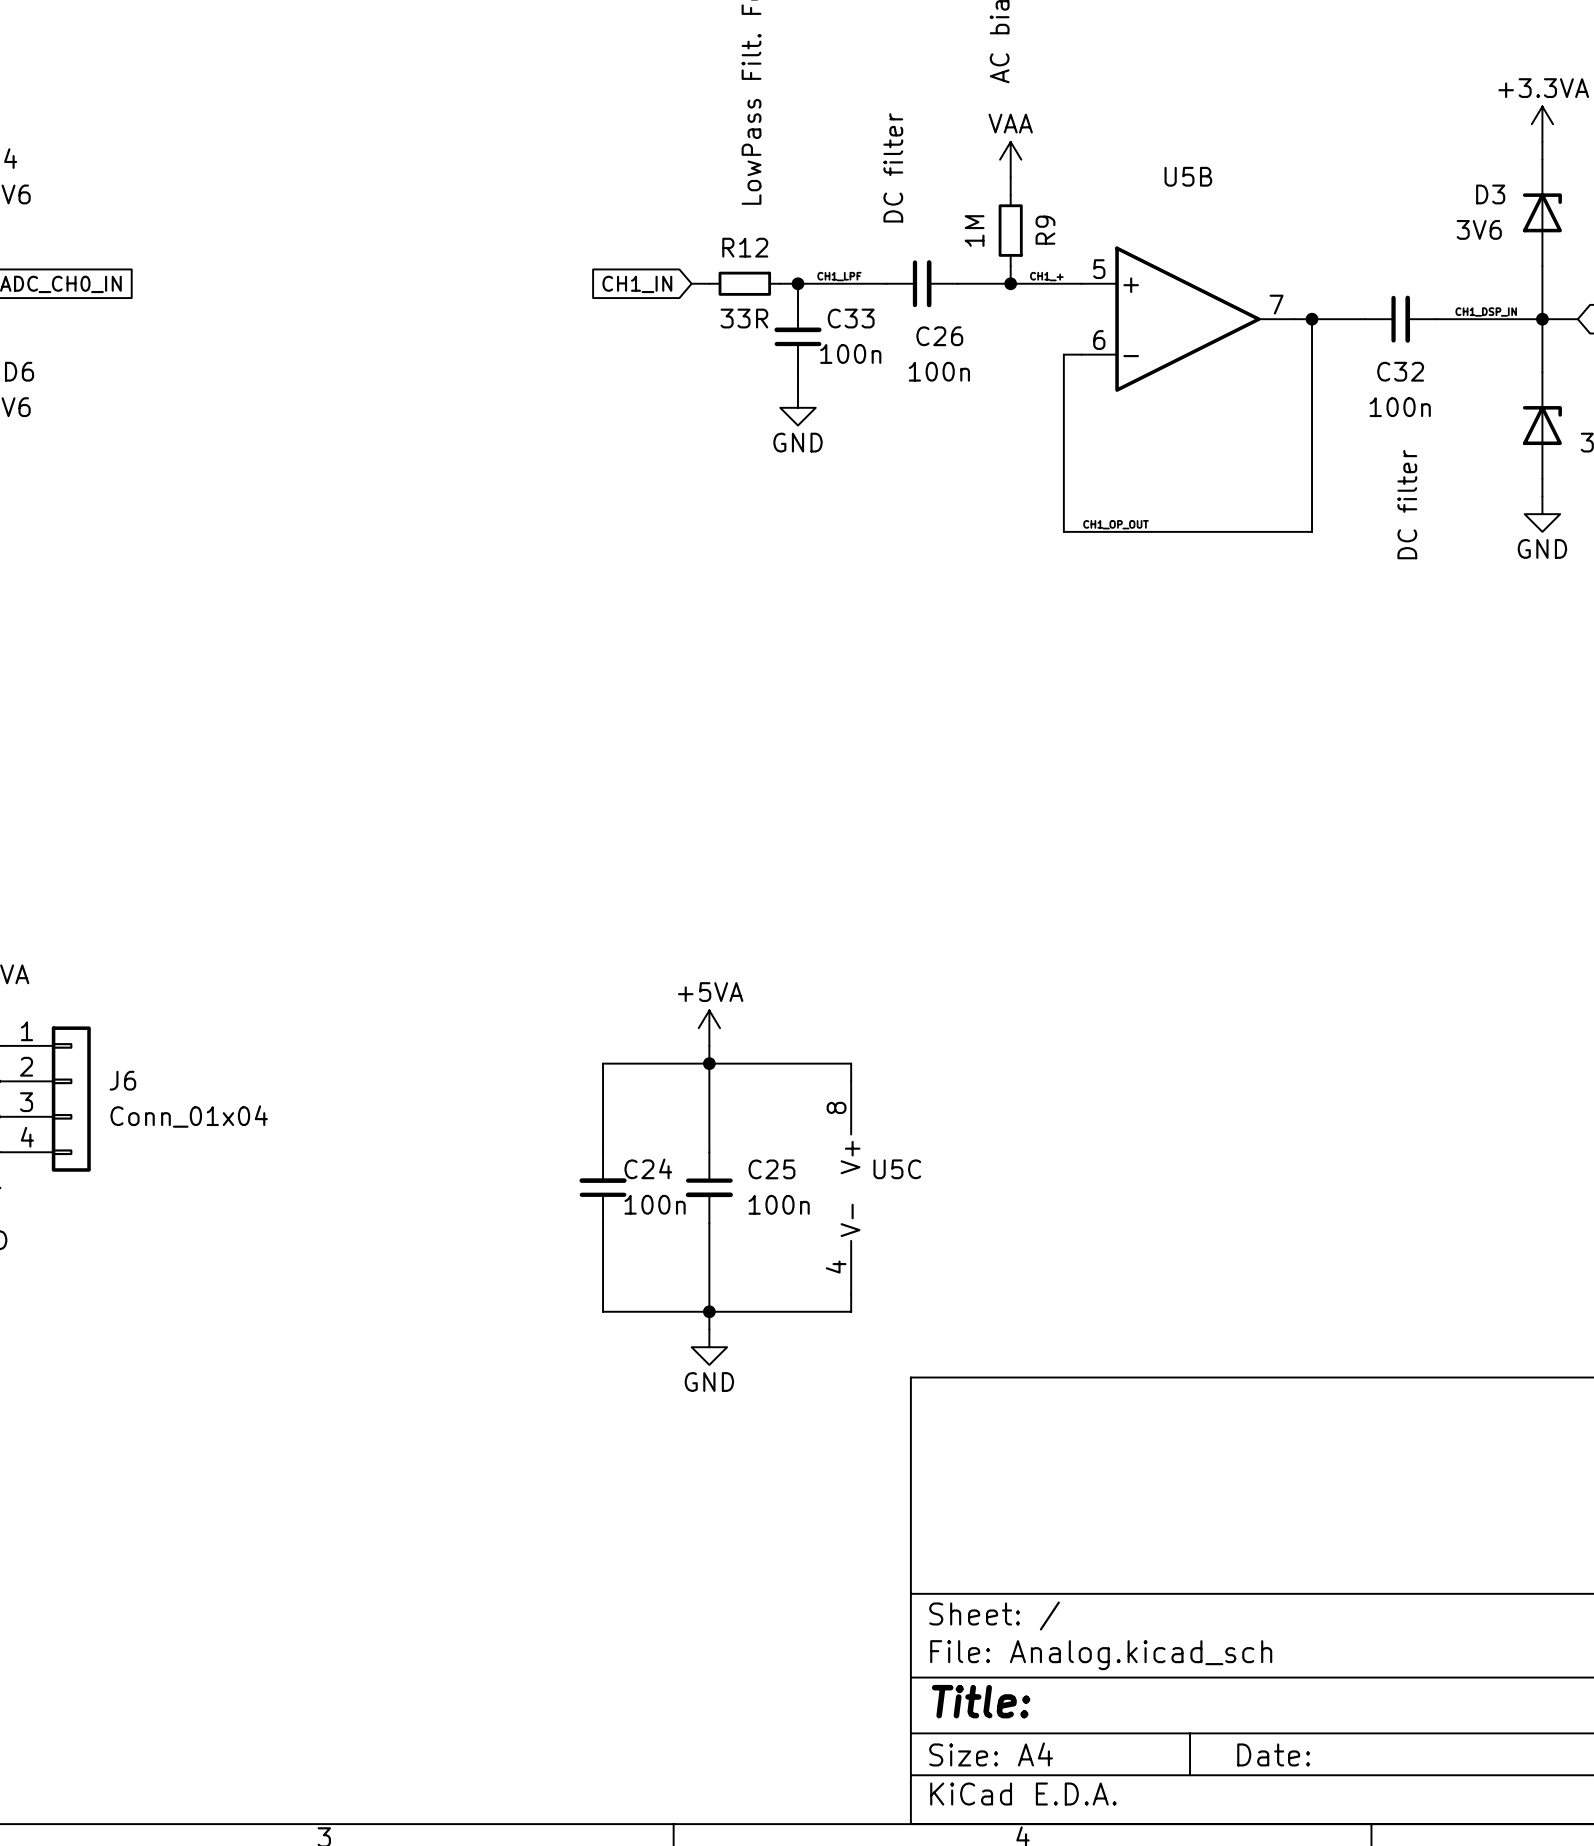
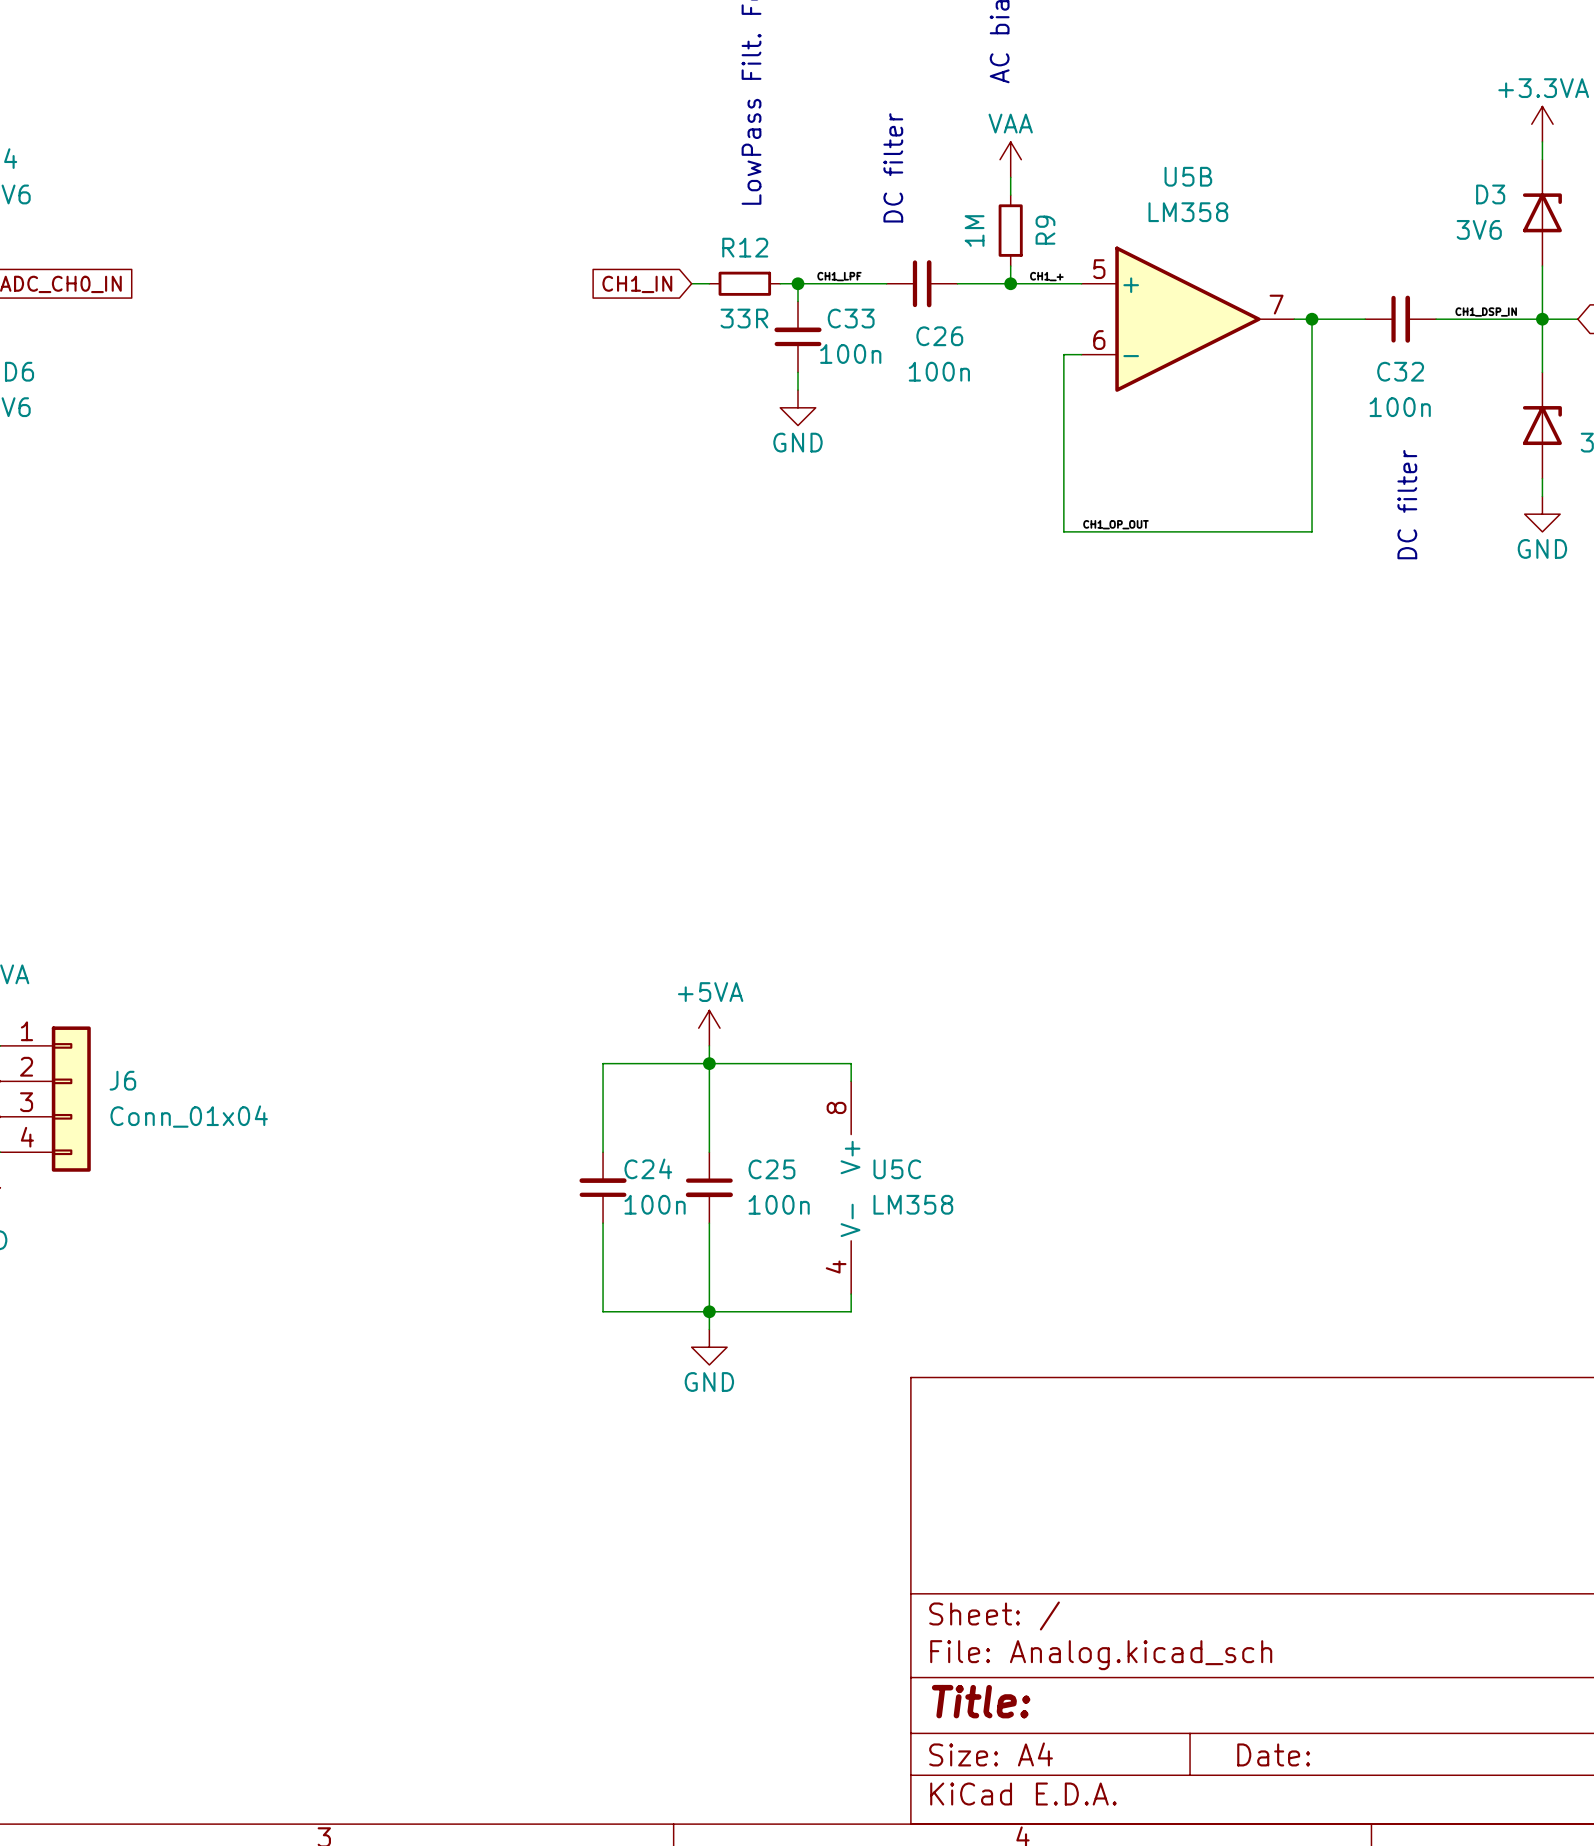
U5B value: none -> LM358 (1188, 212)
U5C value: none -> LM358 (913, 1204)

